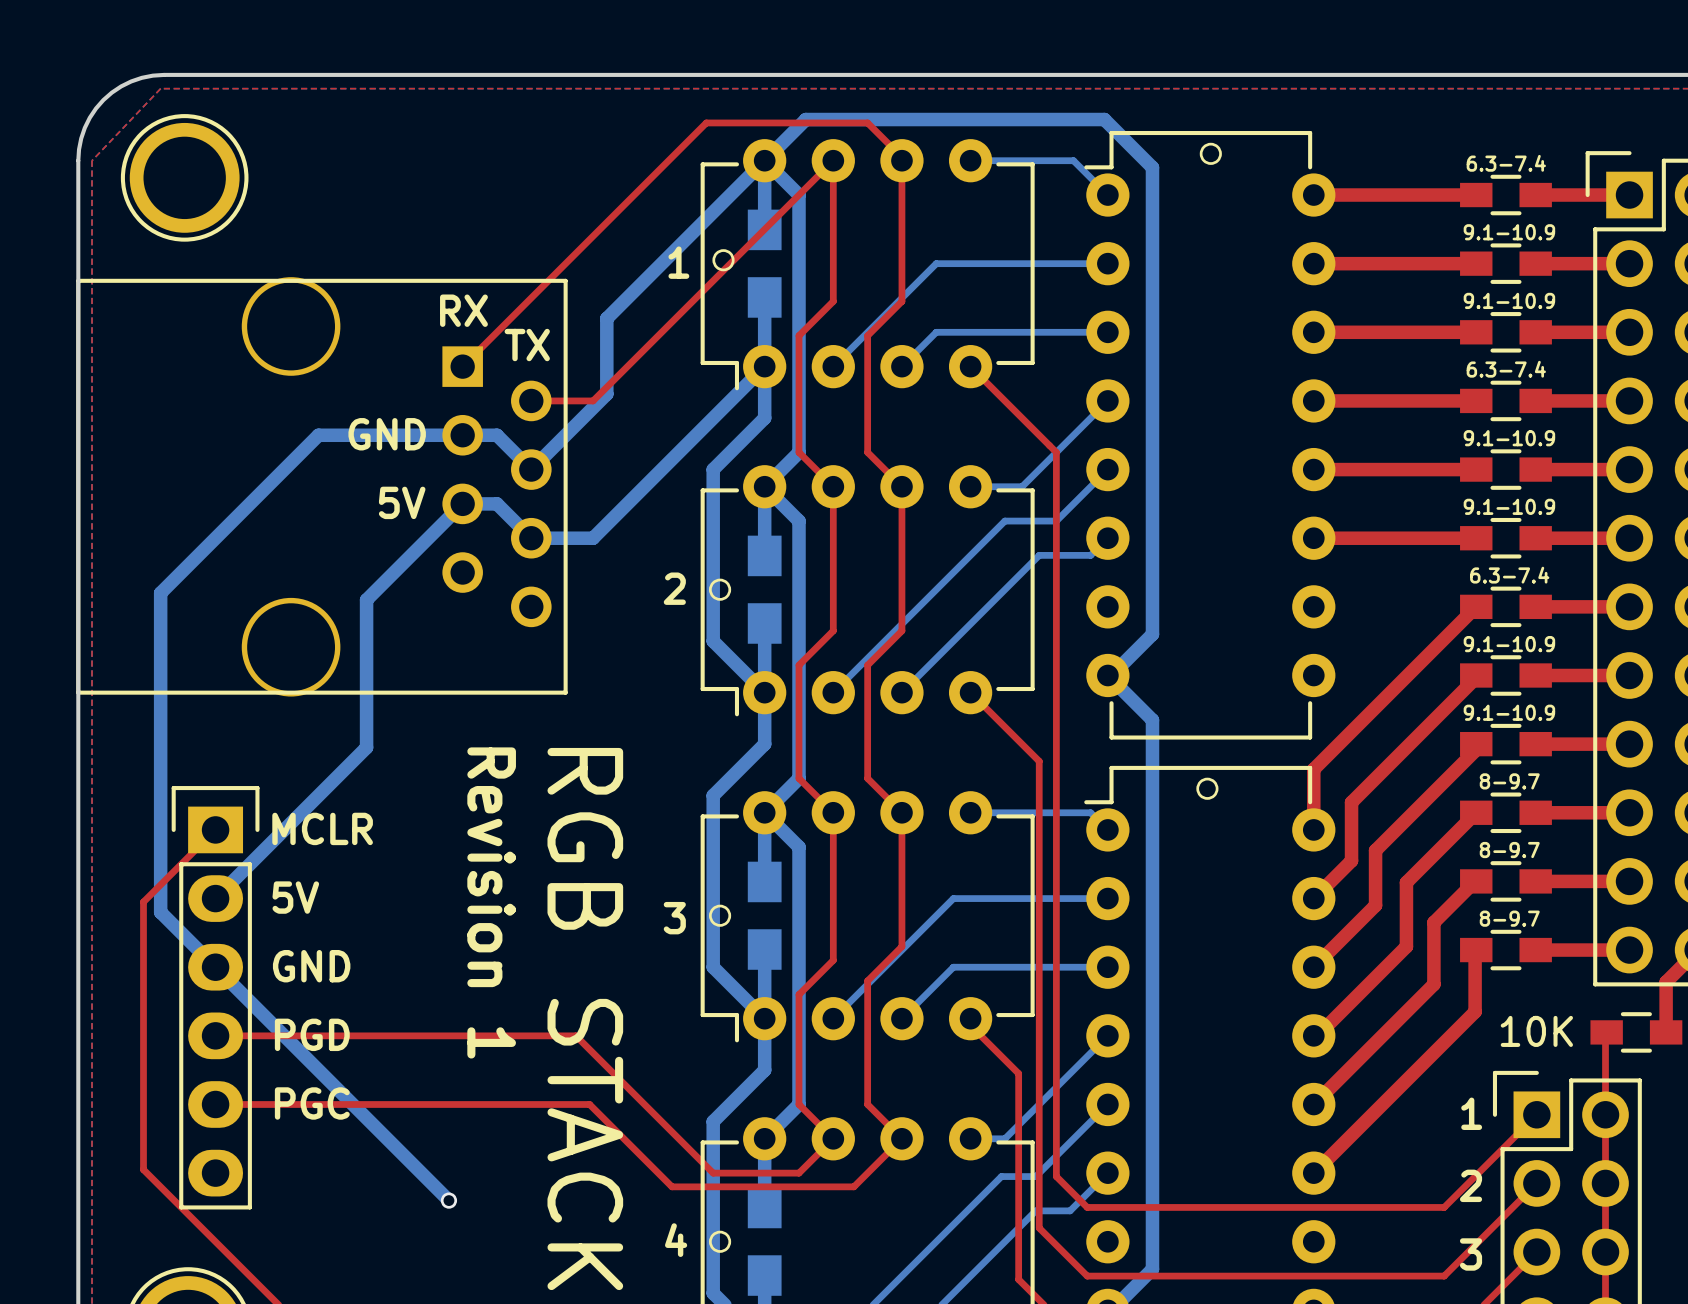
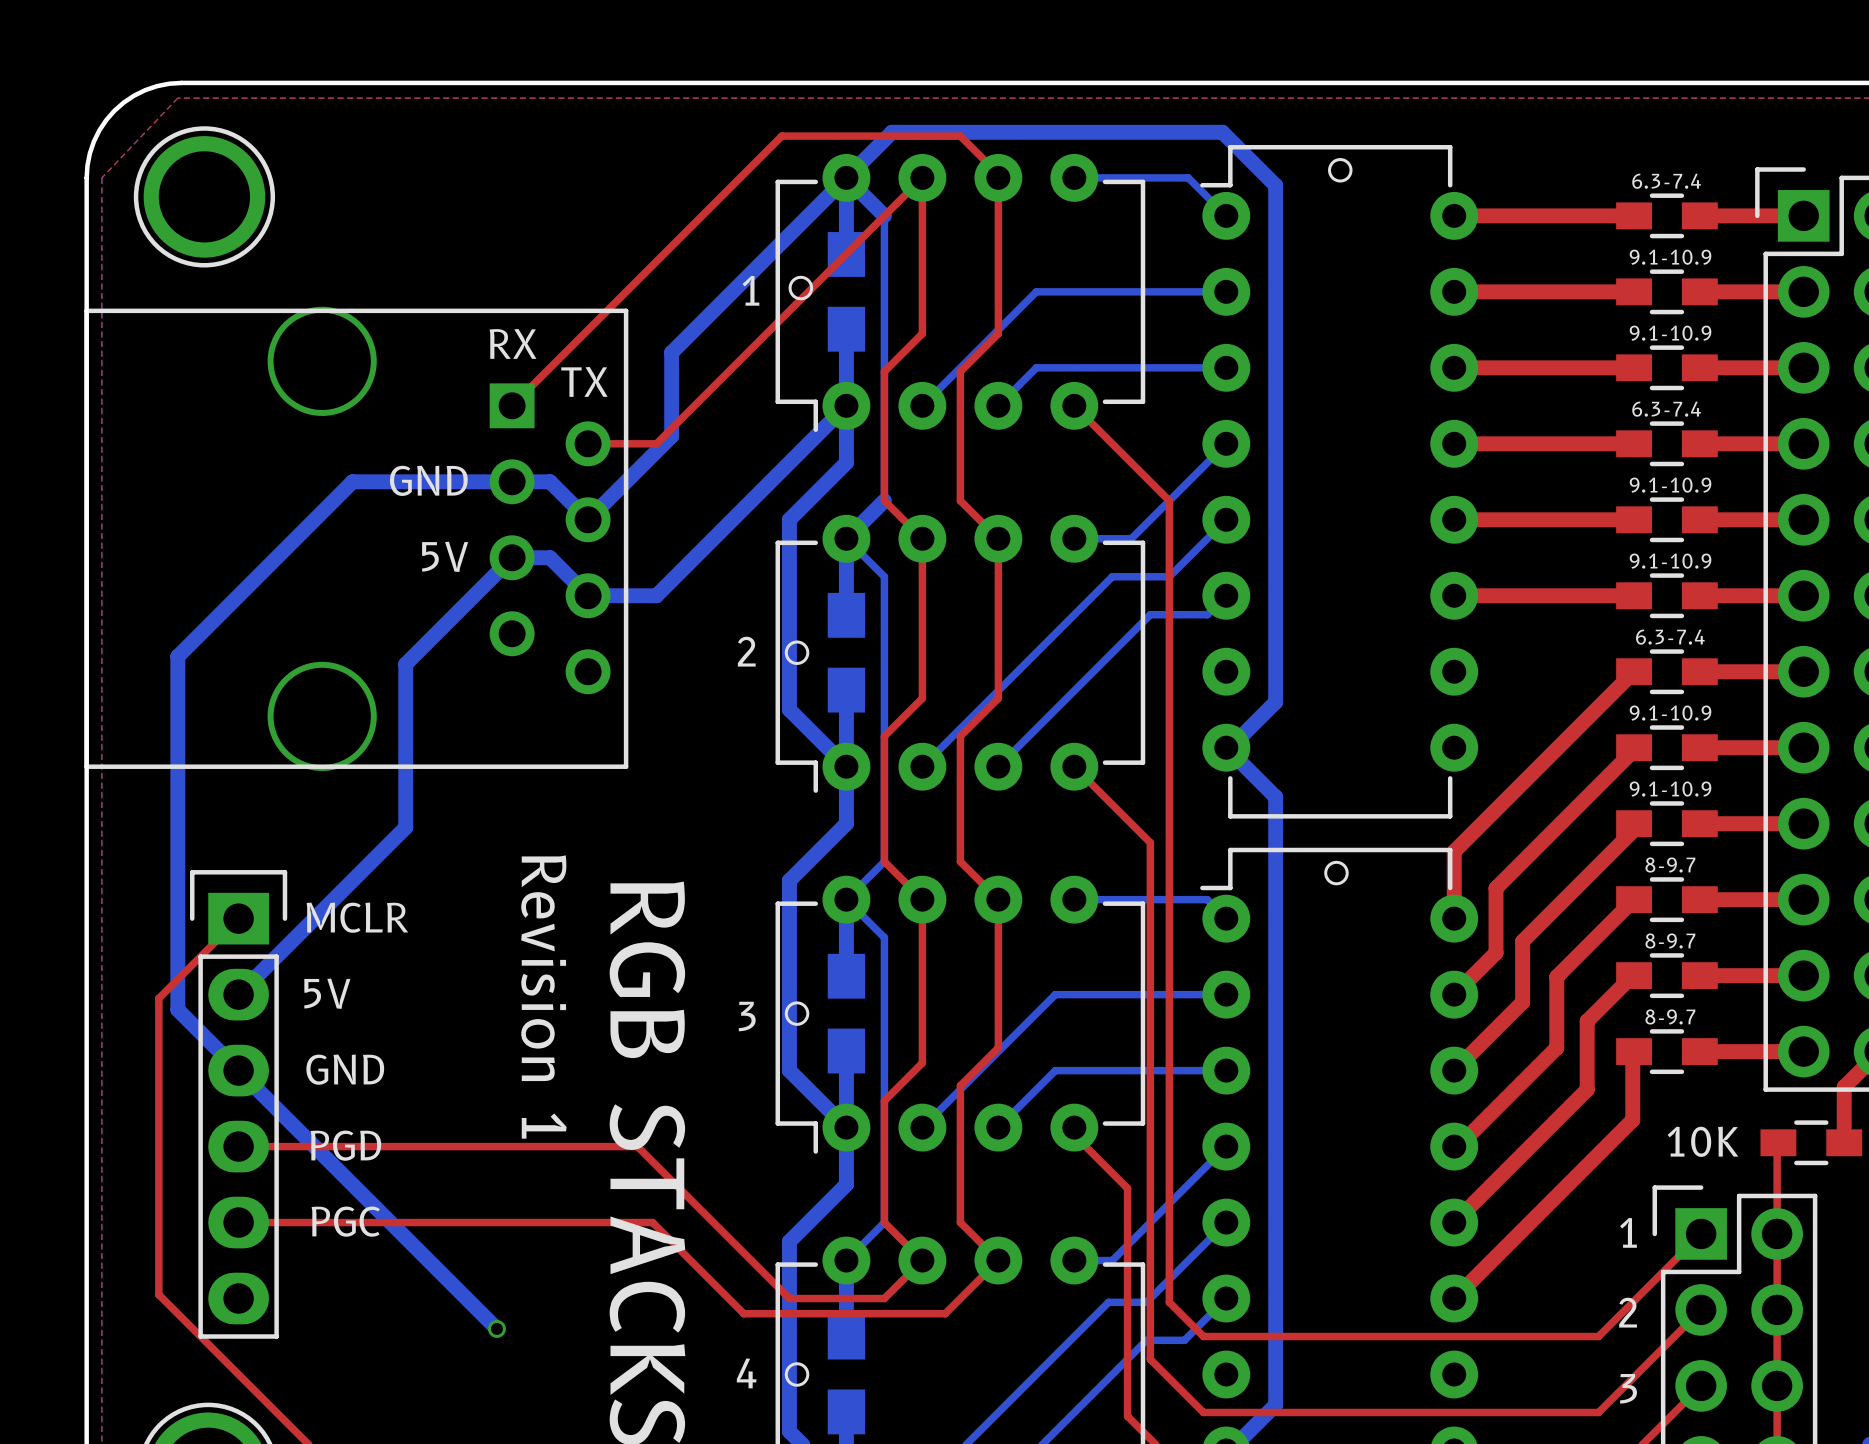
bottom track width: thick (799, 195) (799, 452) -> thin (884, 215) (884, 500)
bottom track width: thick (764, 486) (799, 521) (799, 778) (764, 812) (799, 847) (799, 1104) (764, 1138) -> thin (846, 538) (884, 576) (884, 861) (846, 899) (884, 937) (884, 1222) (846, 1260)

